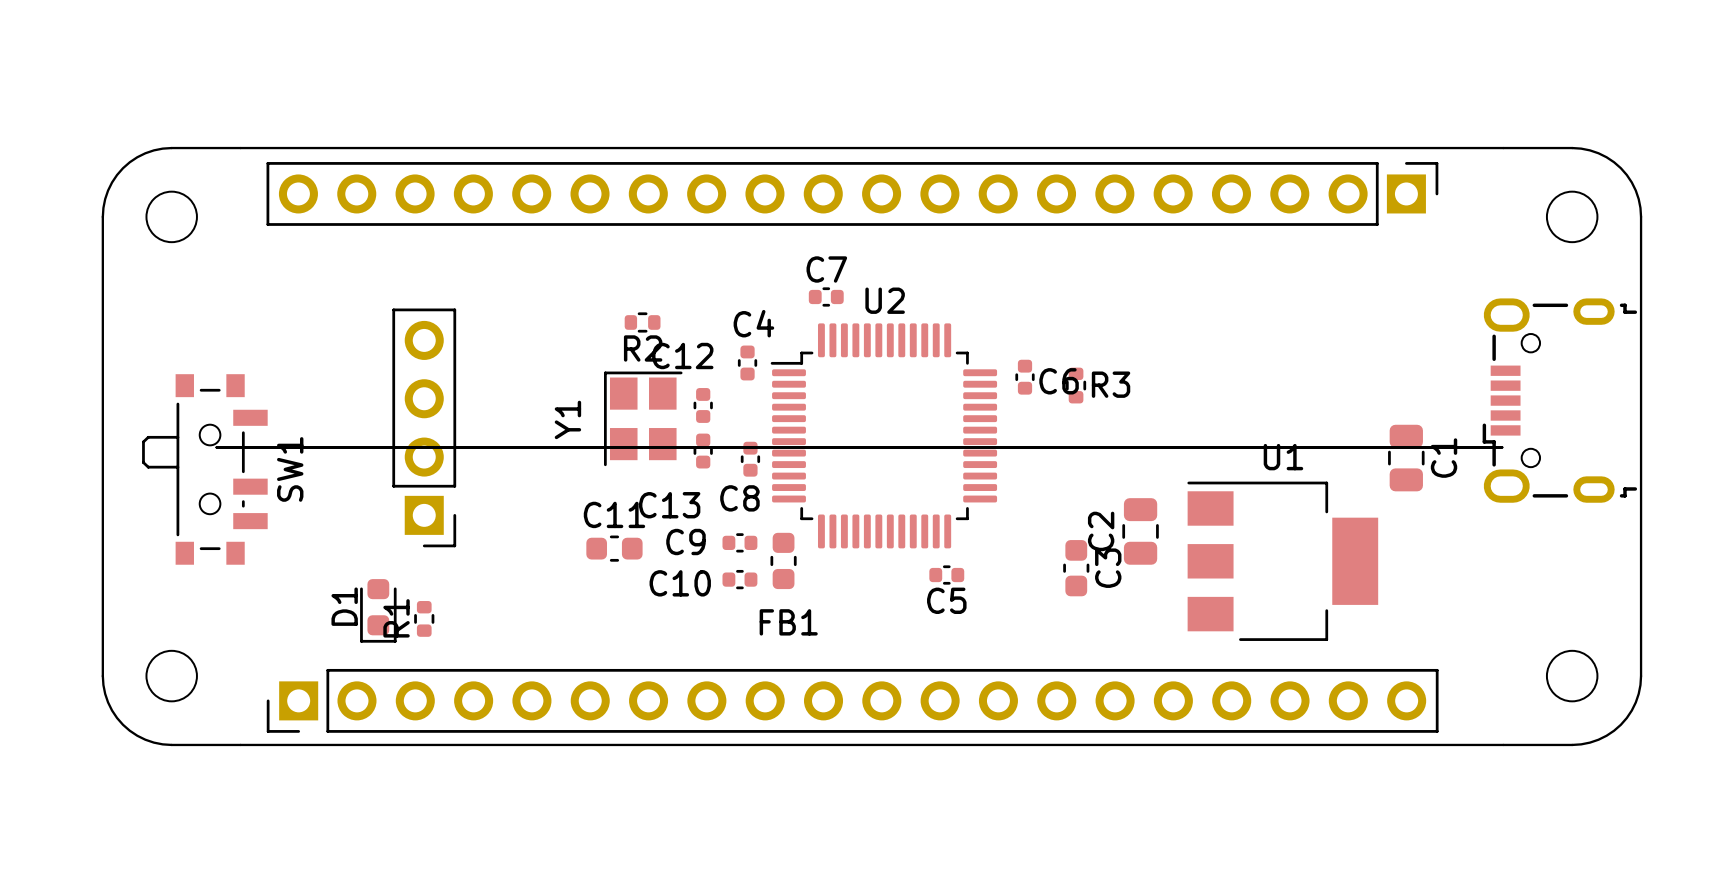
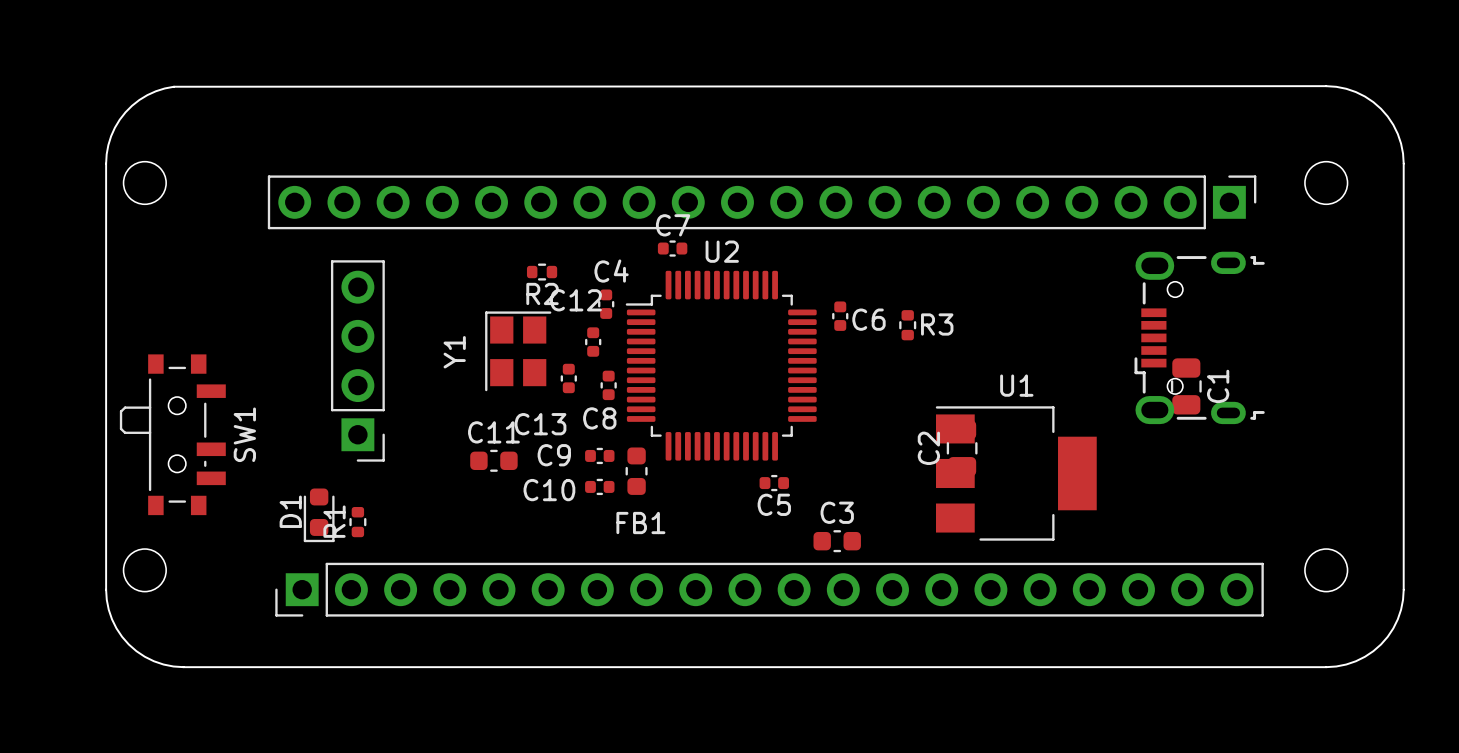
board edge: (171, 148) (1572, 148) (1598, 153) (1614, 162) (1626, 174) (1635, 190) (1640, 207) (1641, 676) (1635, 702) (1626, 718) (1614, 730) (1590, 742) (1572, 744) (171, 744) (145, 739) (129, 730) (117, 718) (108, 702) (103, 685) (102, 216) (108, 190) (123, 168) (145, 153) (171, 148) -> (1326, 86) (173, 86) (155, 91) (139, 99) (125, 112) (111, 136) (106, 154) (106, 589) (112, 619) (122, 636) (136, 651) (163, 664) (183, 667) (1326, 667) (1355, 661) (1373, 651) (1387, 636) (1397, 619) (1403, 599) (1403, 163) (1397, 133) (1381, 108) (1355, 92) (1326, 86)
part position: (852, 193) -> (762, 202)
C7 position: (826, 296) -> (672, 248)
C4 position: (747, 362) -> (606, 304)
C6 position: (1025, 377) -> (840, 316)
part position: (1559, 400) -> (1199, 337)
Y1 position: (643, 418) -> (518, 351)
U2 position: (883, 435) -> (721, 365)
board edge: (216, 447) (1502, 447) -> none
C13 position: (703, 451) -> (568, 378)
C8 position: (750, 459) -> (608, 385)
SW1 position: (204, 469) -> (172, 434)
C9 position: (739, 542) -> (599, 455)
C11 position: (614, 548) -> (493, 460)
FB1 position: (783, 560) -> (636, 471)
U1 position: (1282, 561) -> (1016, 473)
C3 rotation: 0° (1076, 568) -> 90° clockwise (837, 541)
C3 position: (1076, 568) -> (837, 541)
C3 name position: C3 (1108, 568) -> C3 (837, 512)
C5 position: (946, 575) -> (774, 483)
C10 position: (739, 579) -> (599, 486)
part position: (852, 700) -> (769, 589)

